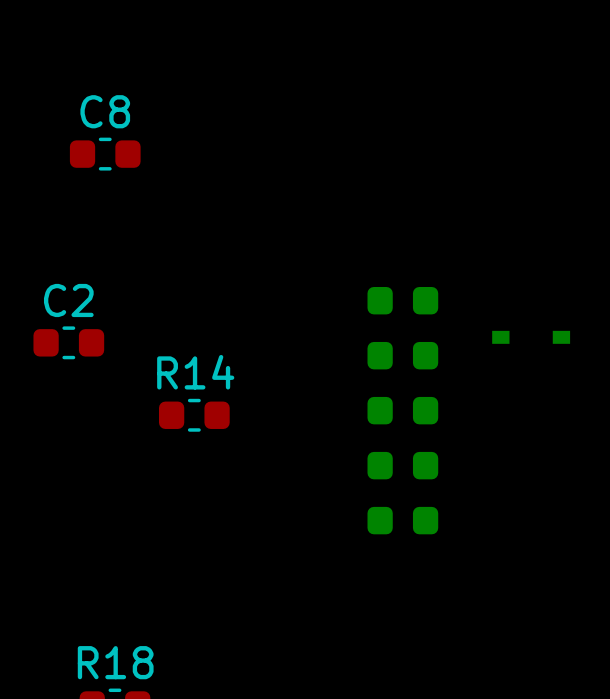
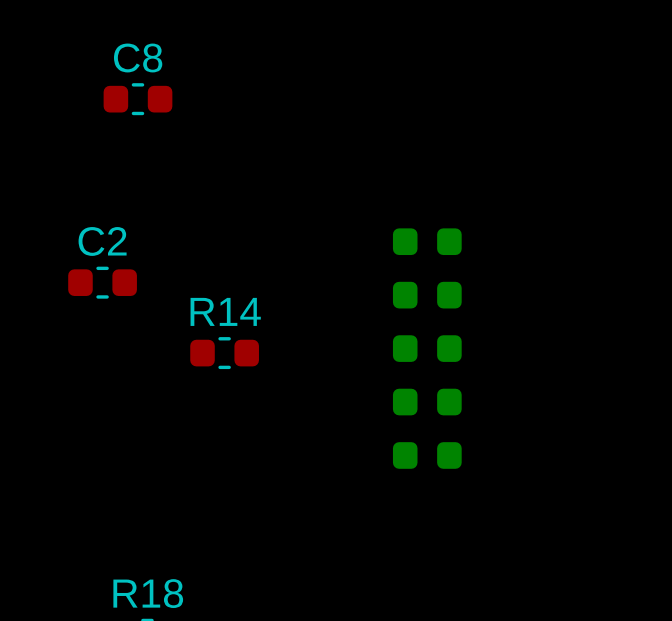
part: (531, 337) -> none

